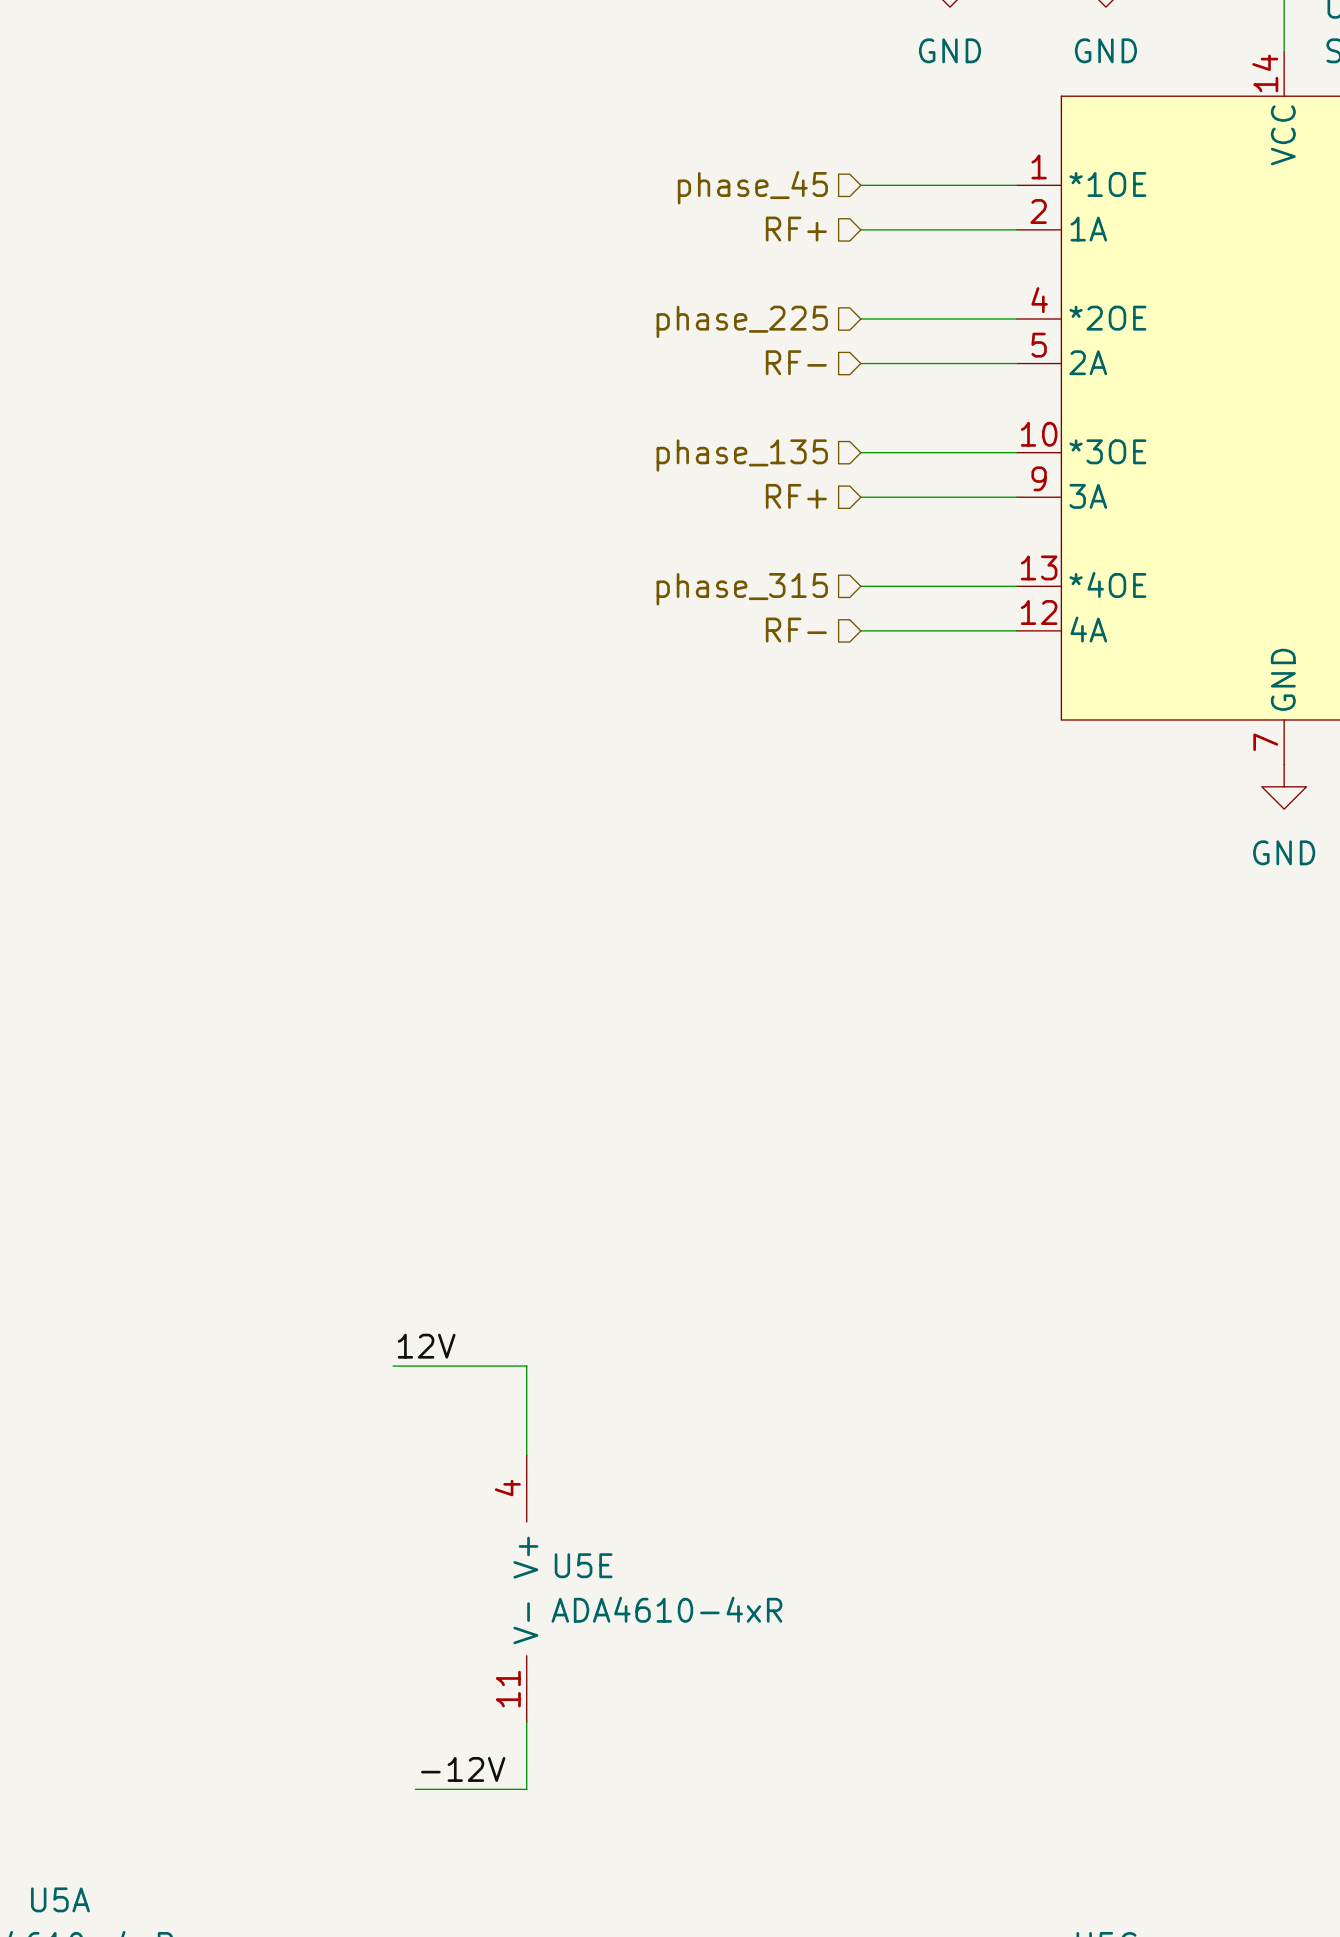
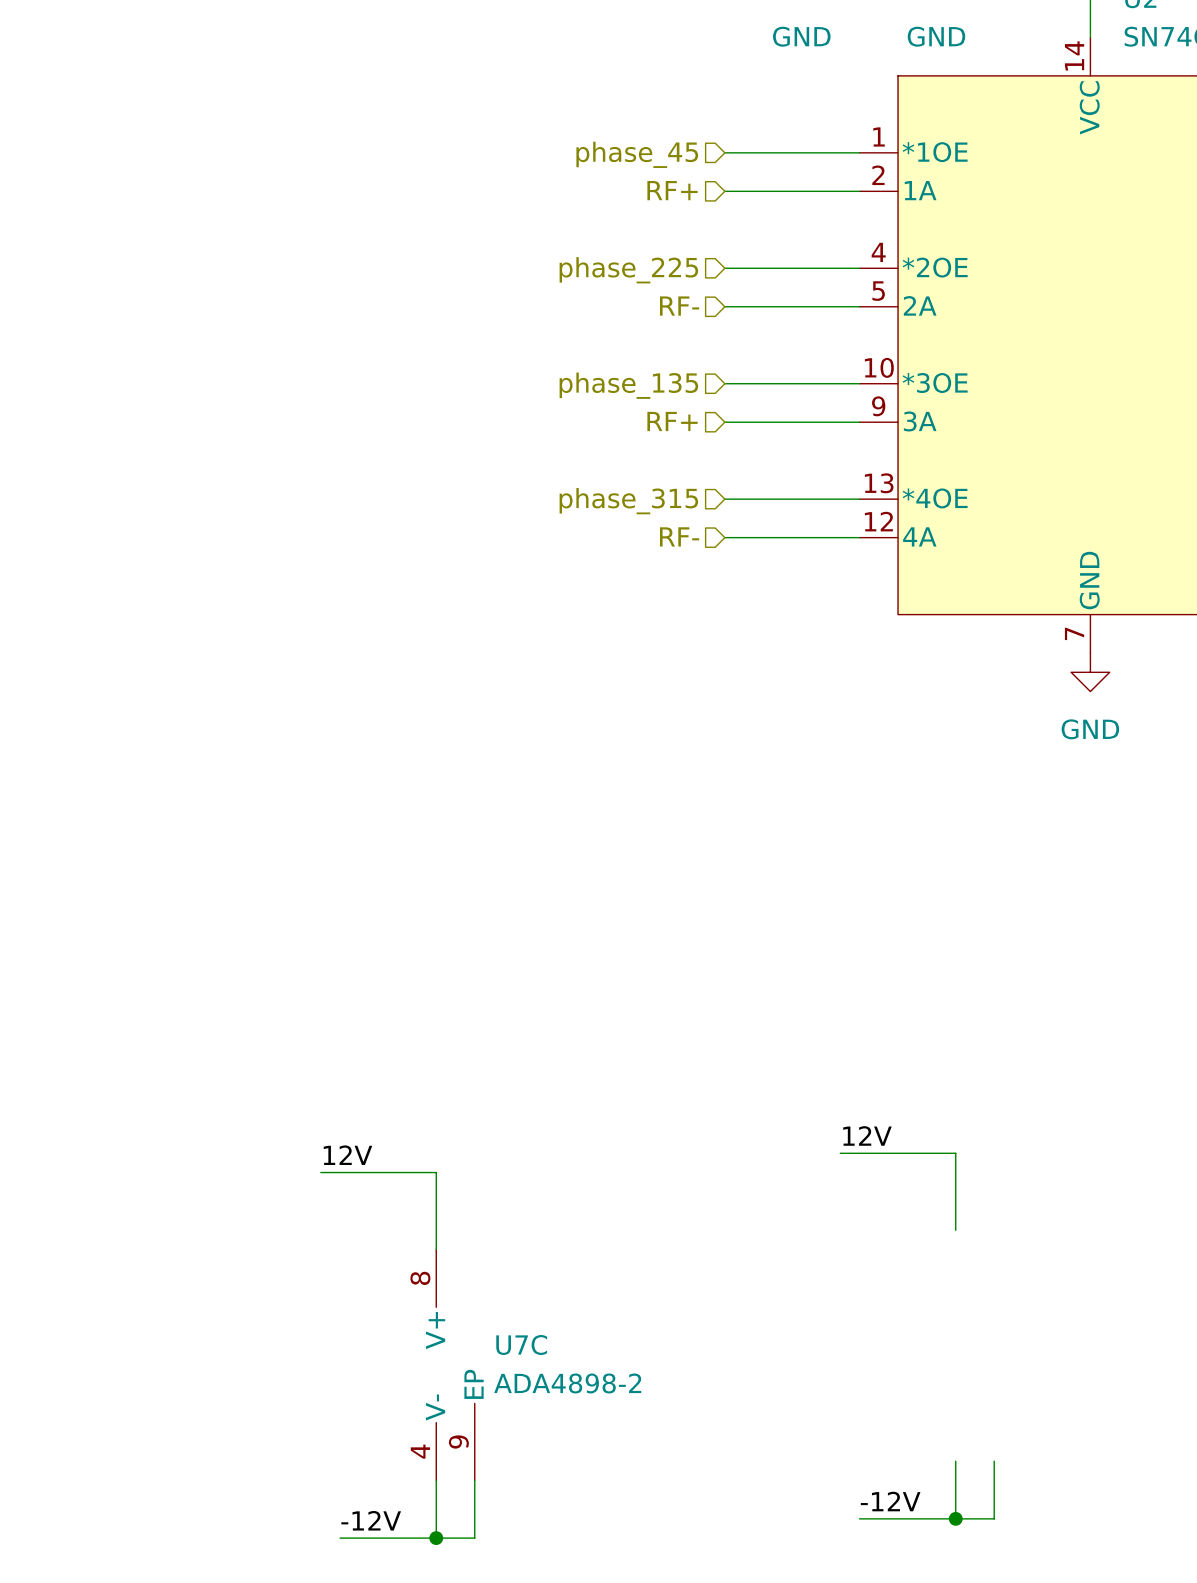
label: none -> 12V (867, 1135)
wire: none -> (840, 1153) (955, 1153) (955, 1230)
U5E: ADA4610-4xR (526, 1588) -> none
U7C: none -> ADA4898-2 (455, 1364)
wire: none -> (955, 1461) (955, 1518)
wire: none -> (994, 1461) (994, 1518) (859, 1518)
wire: none -> (474, 1480) (474, 1538) (436, 1538)
label: none -> -12V (890, 1501)
junction: none -> (955, 1518)
junction: none -> (436, 1538)

